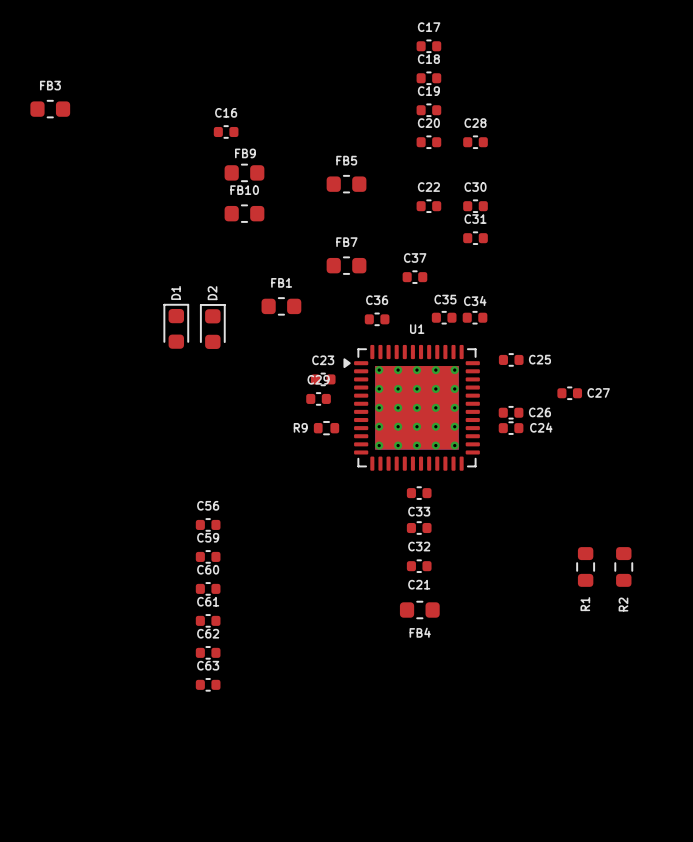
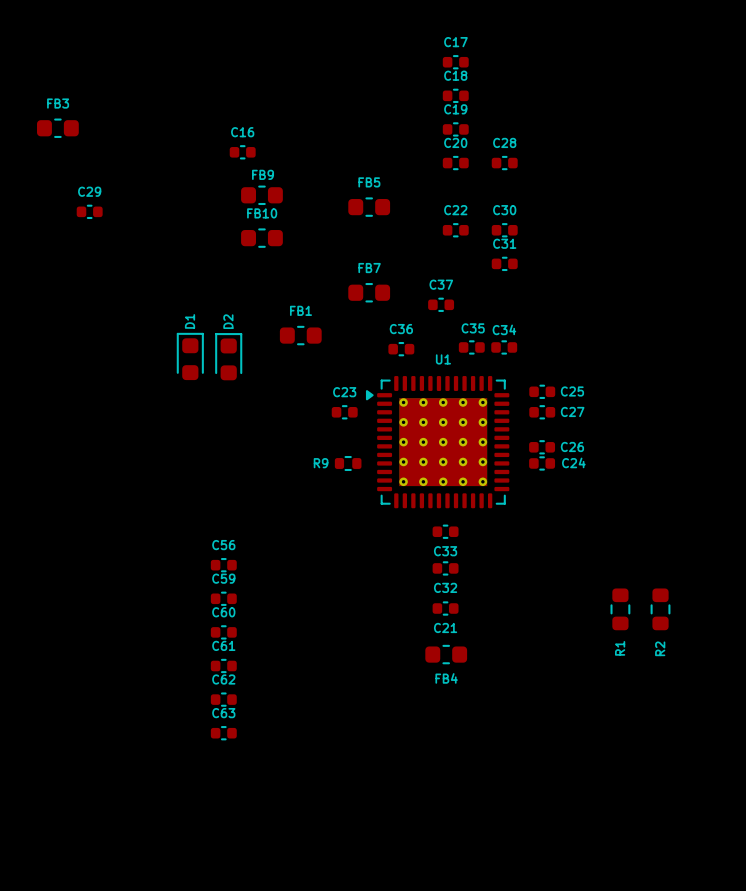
C27 position: (569, 393) -> (542, 412)
C29 position: (318, 398) -> (89, 211)

